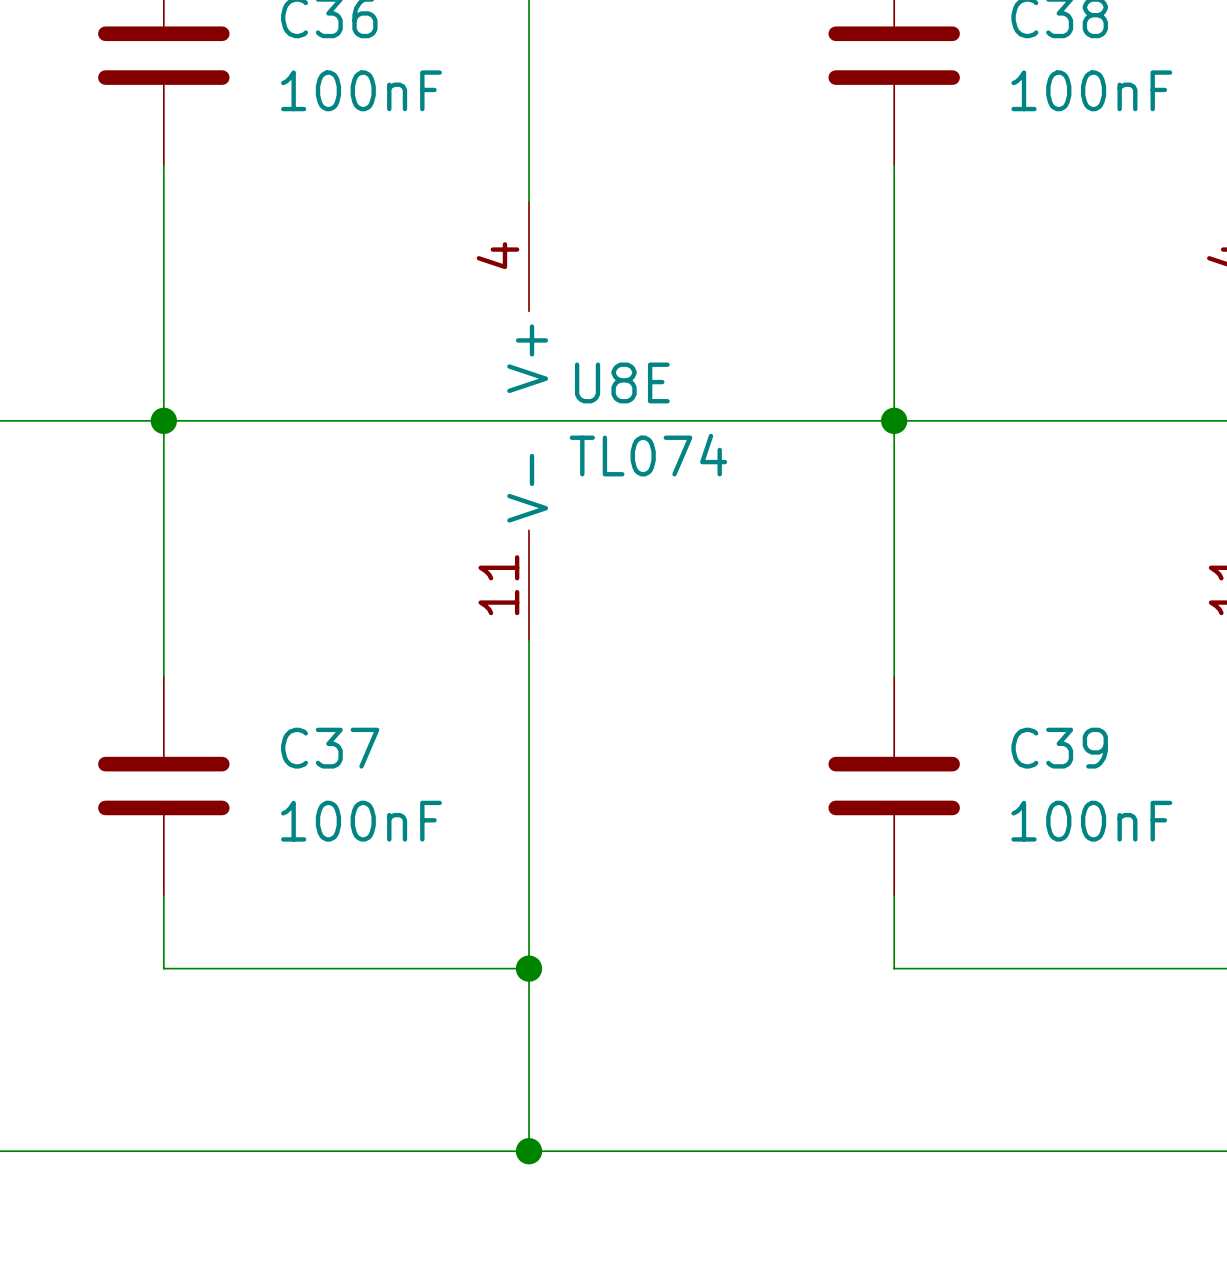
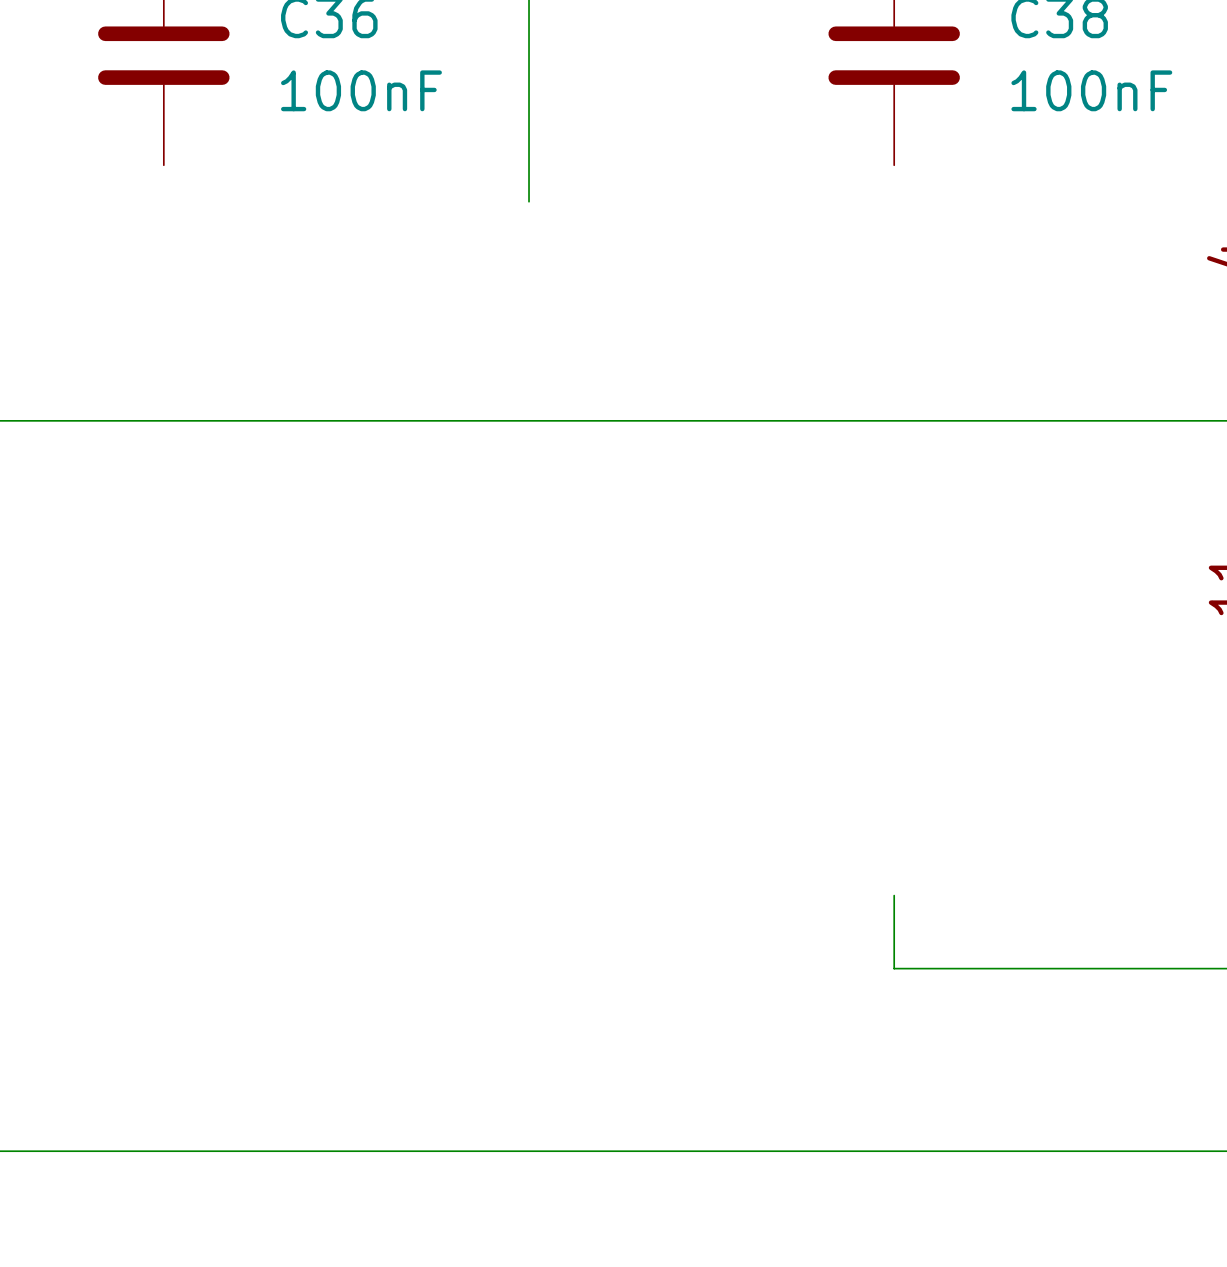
wire: (163, 165) (163, 676) -> none
wire: (894, 165) (894, 676) -> none
junction: (163, 420) -> none
U8E: TL074 (529, 420) -> none
junction: (894, 420) -> none
wire: (529, 639) (529, 1151) -> none
C37: 100nF (163, 786) -> none
C39: 100nF (894, 786) -> none
wire: (163, 895) (163, 968) (529, 968) -> none
junction: (529, 968) -> none
junction: (529, 1151) -> none

